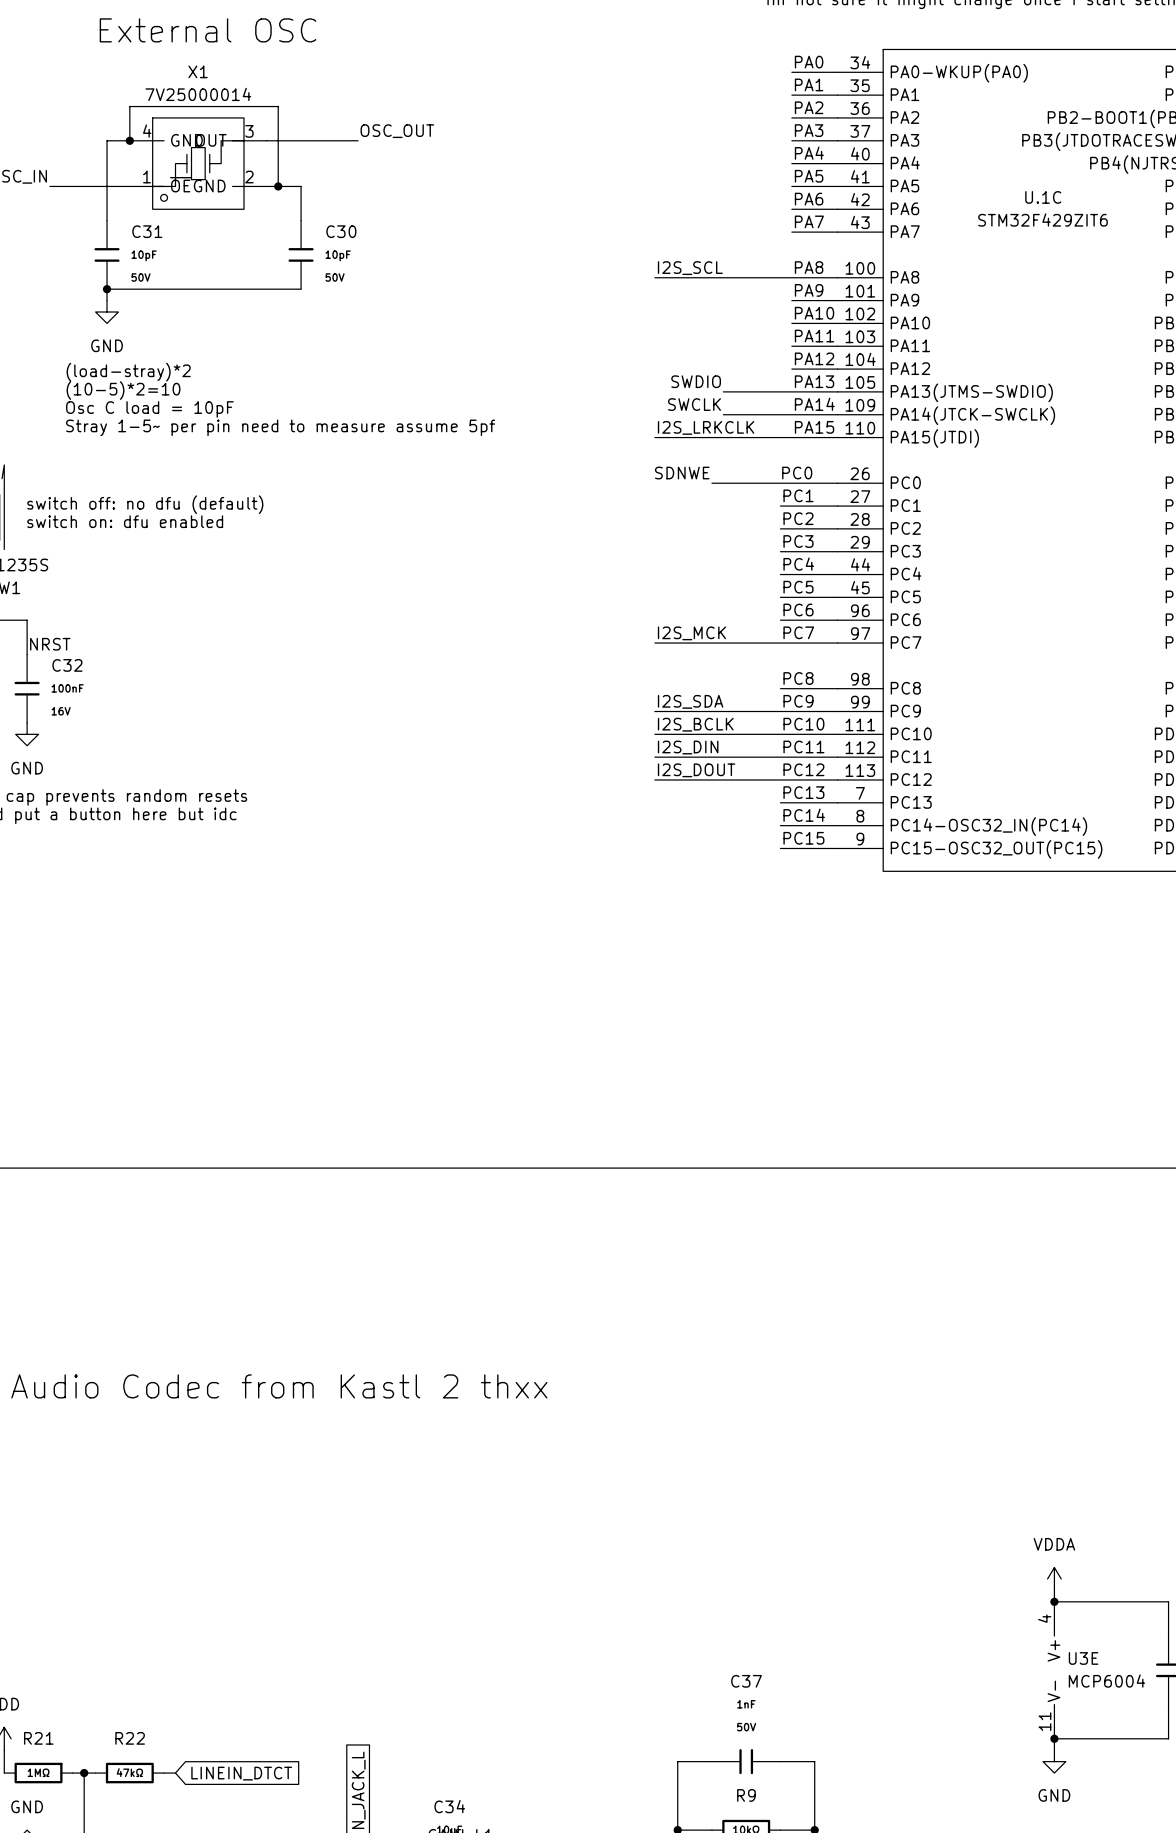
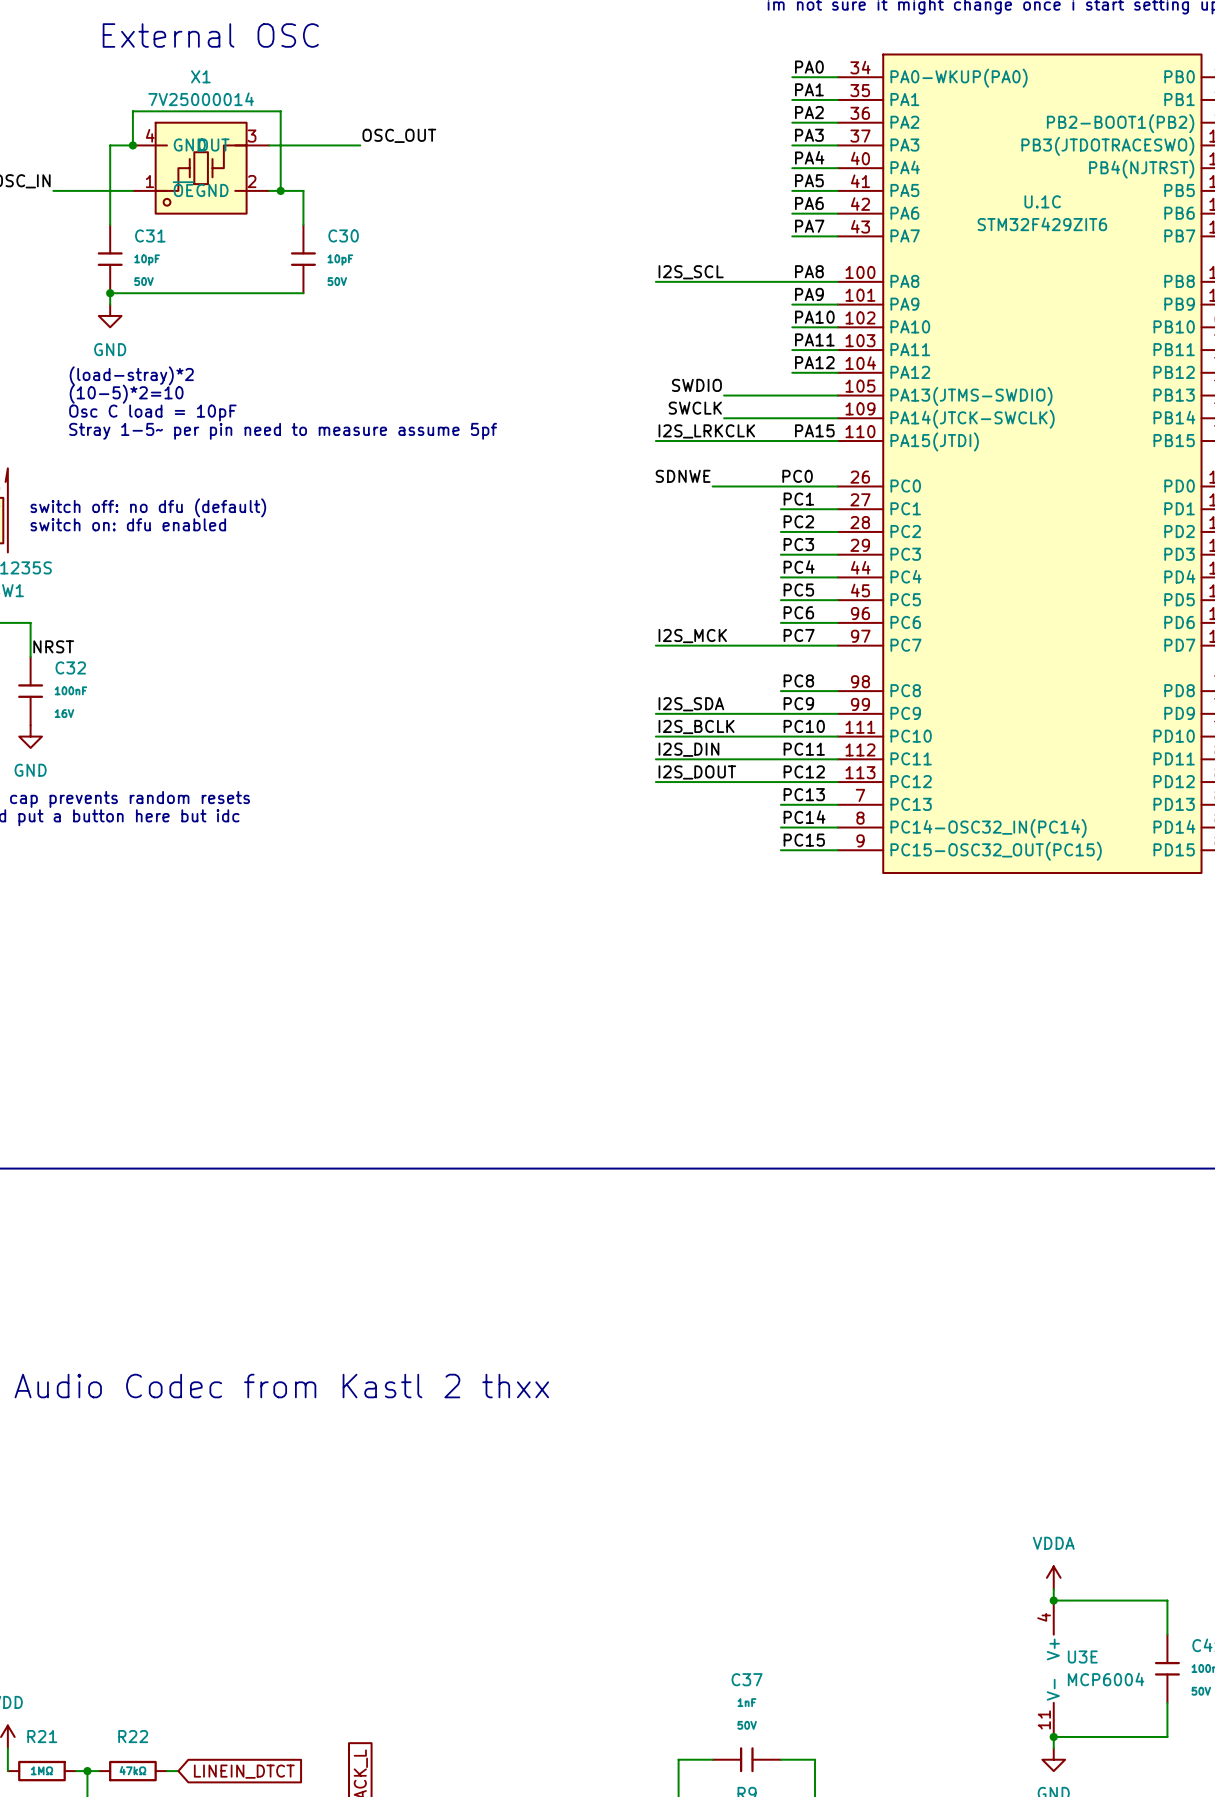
label: PA13 (814, 381) -> none
label: PA14 (814, 404) -> none

